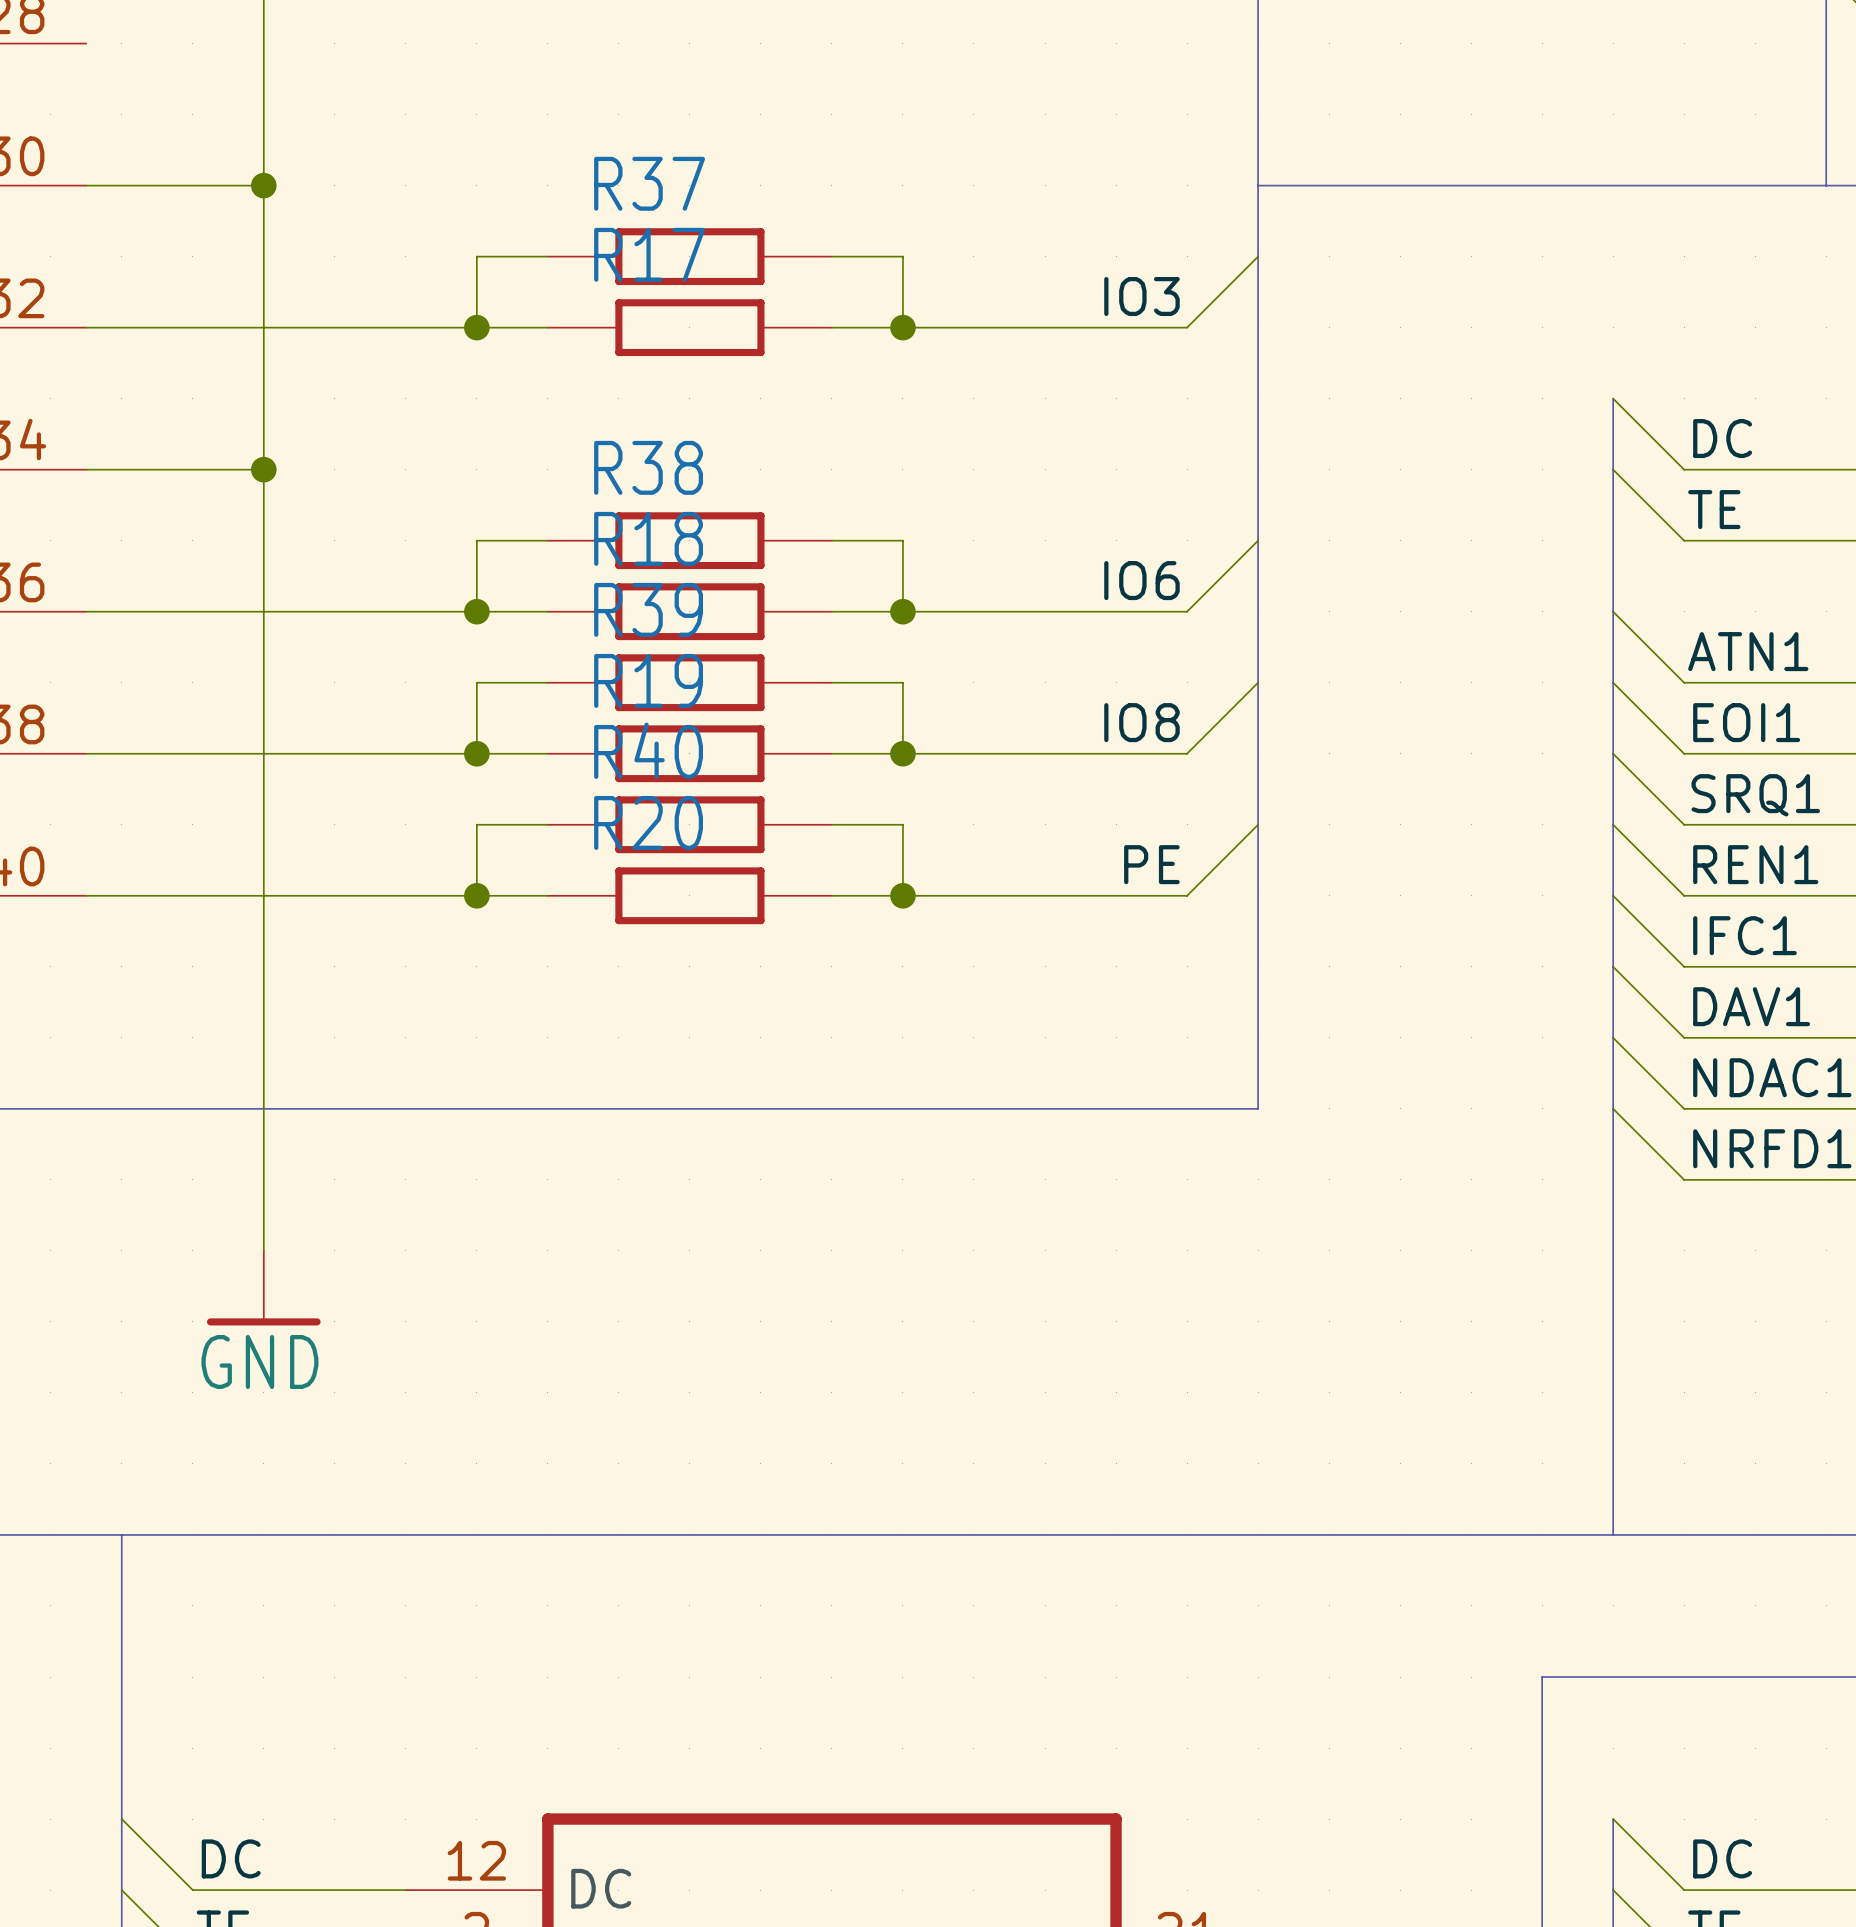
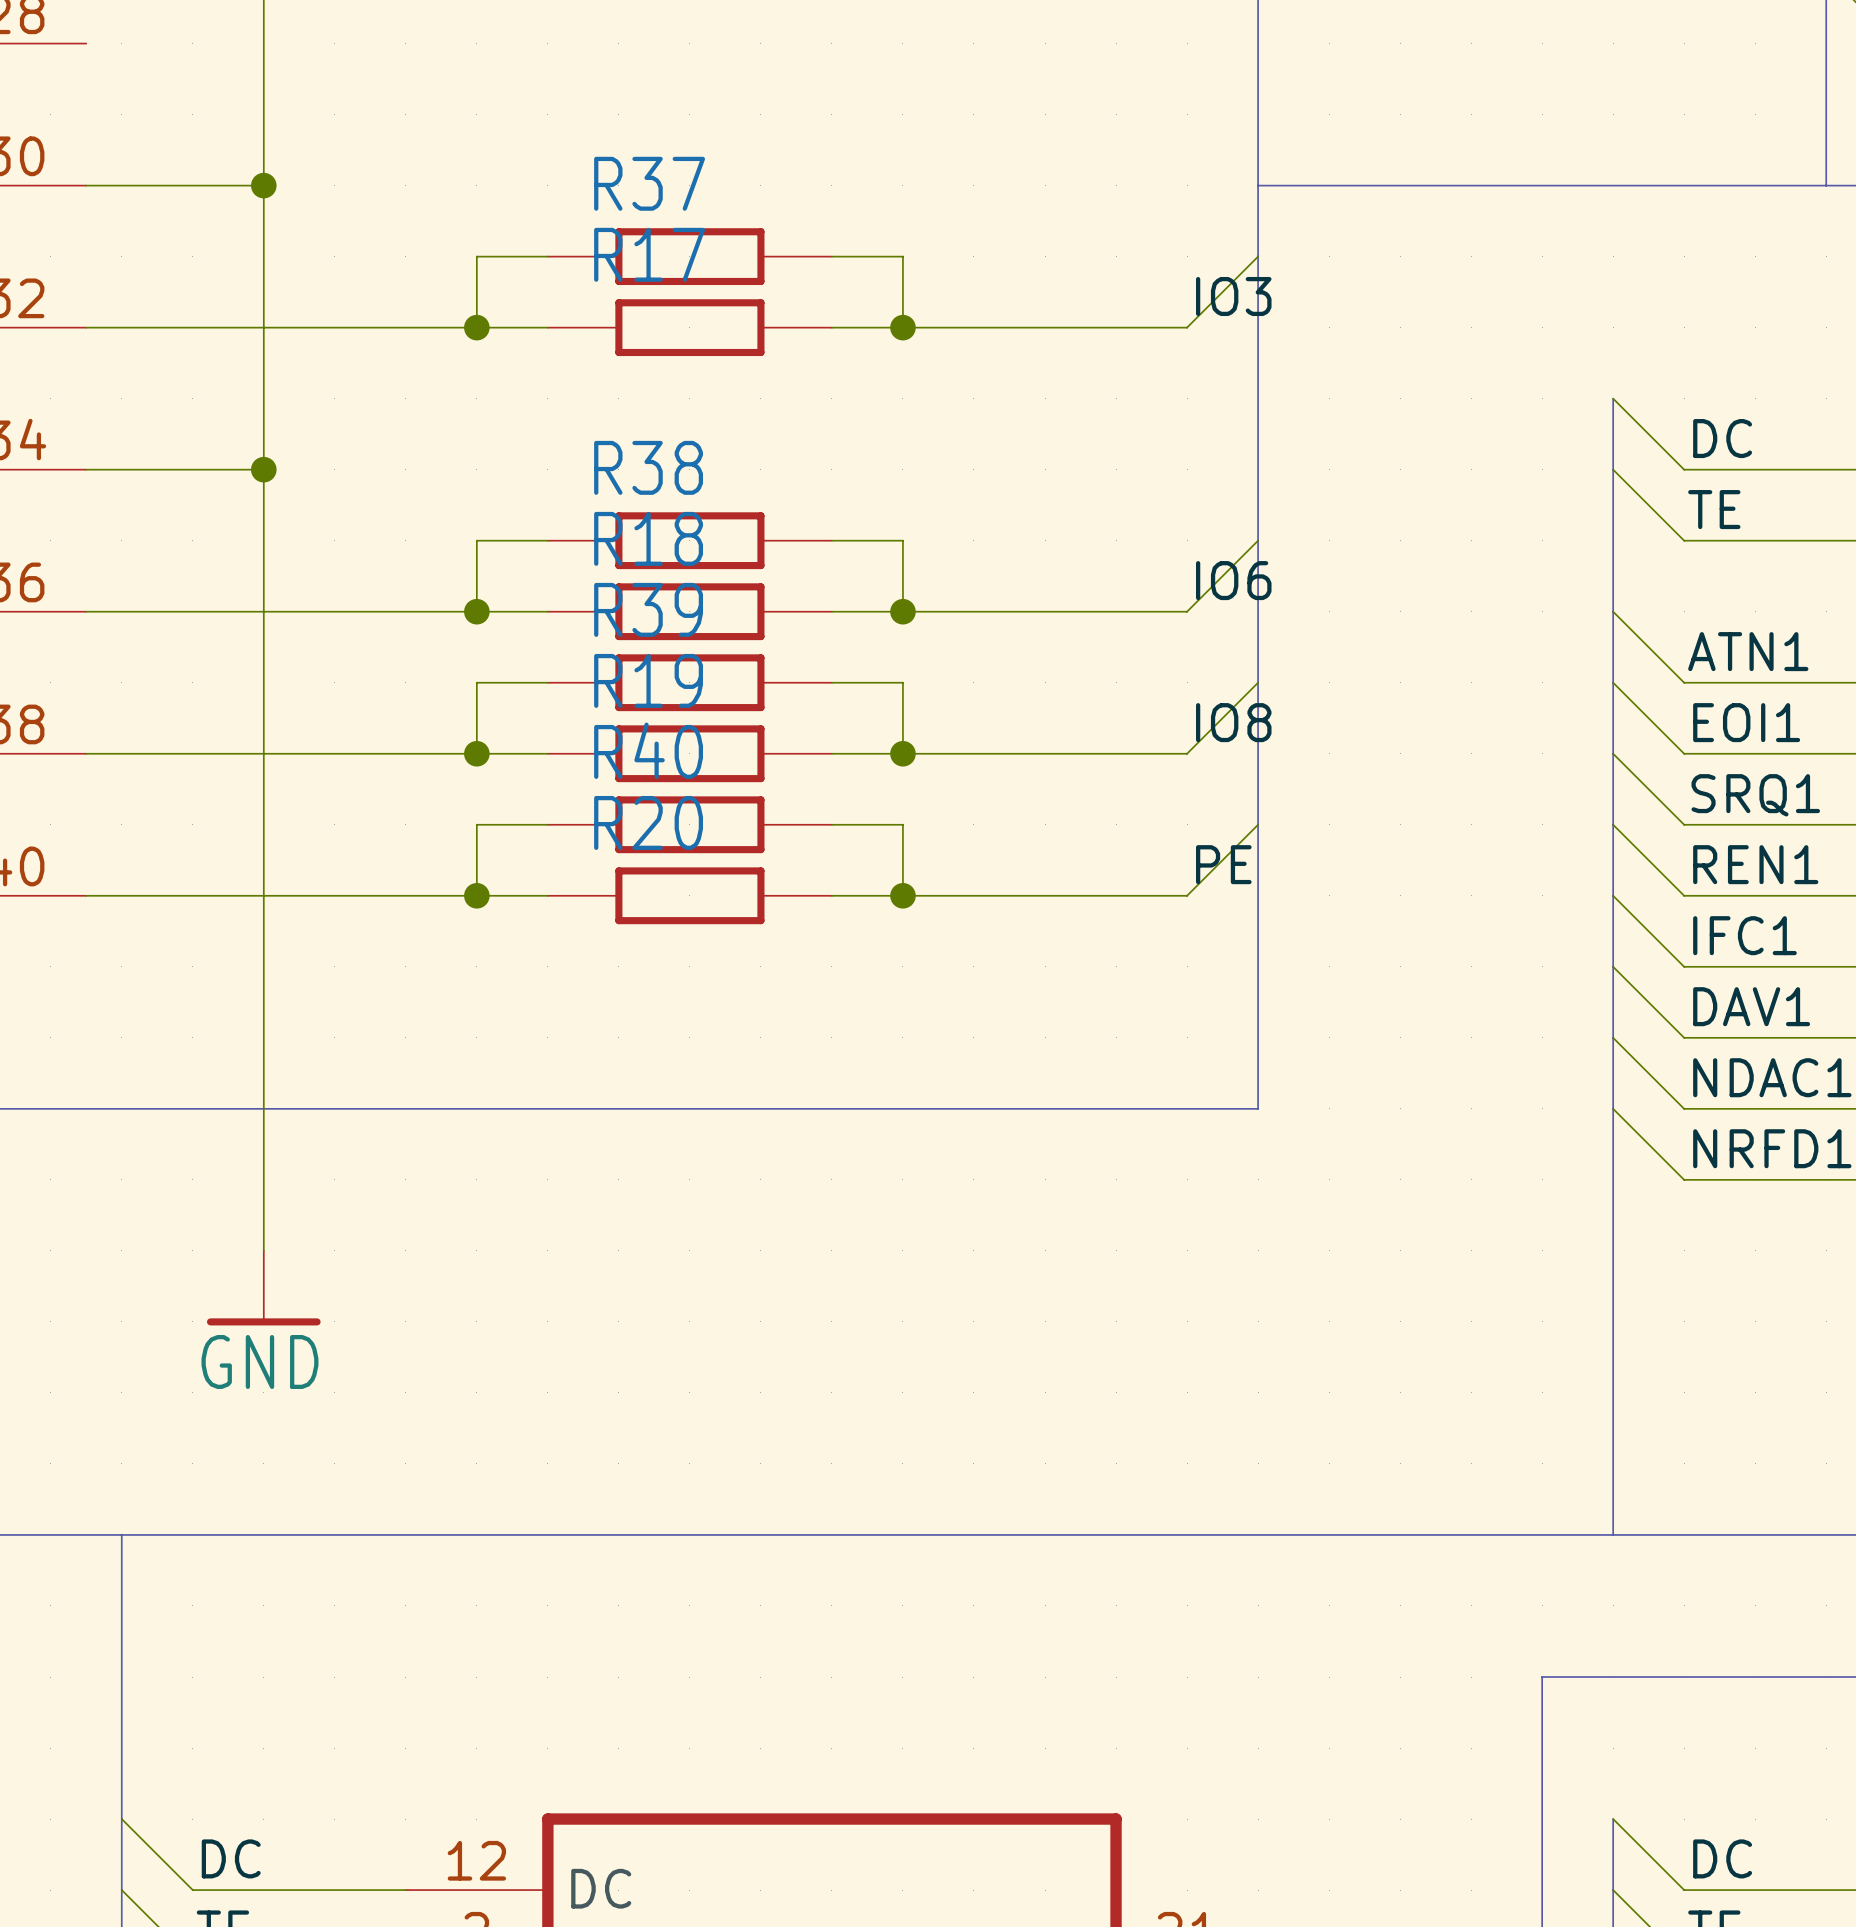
label position: IO3 (1141, 296) -> IO3 (1233, 296)
label position: IO6 (1141, 580) -> IO6 (1233, 580)
label position: IO8 (1141, 722) -> IO8 (1233, 722)
label position: PE (1151, 864) -> PE (1223, 864)

